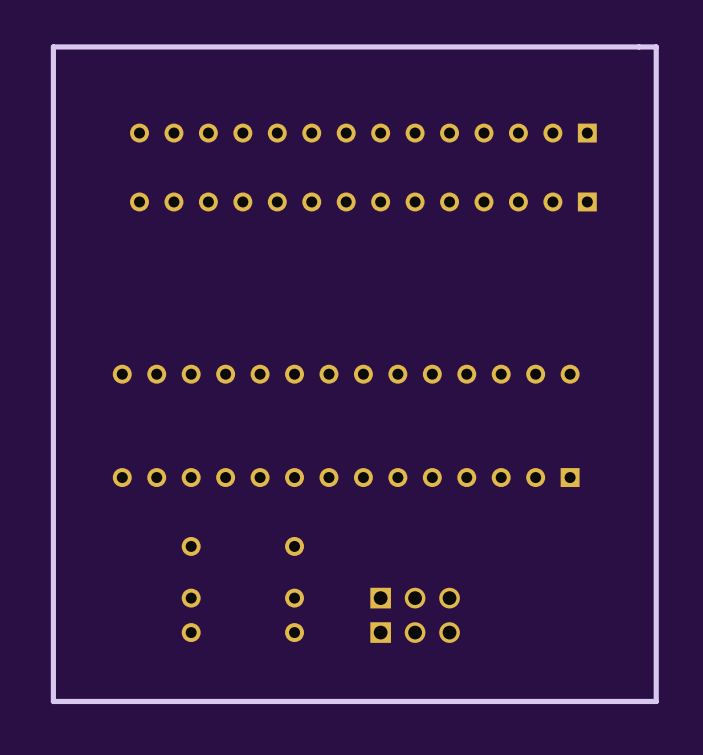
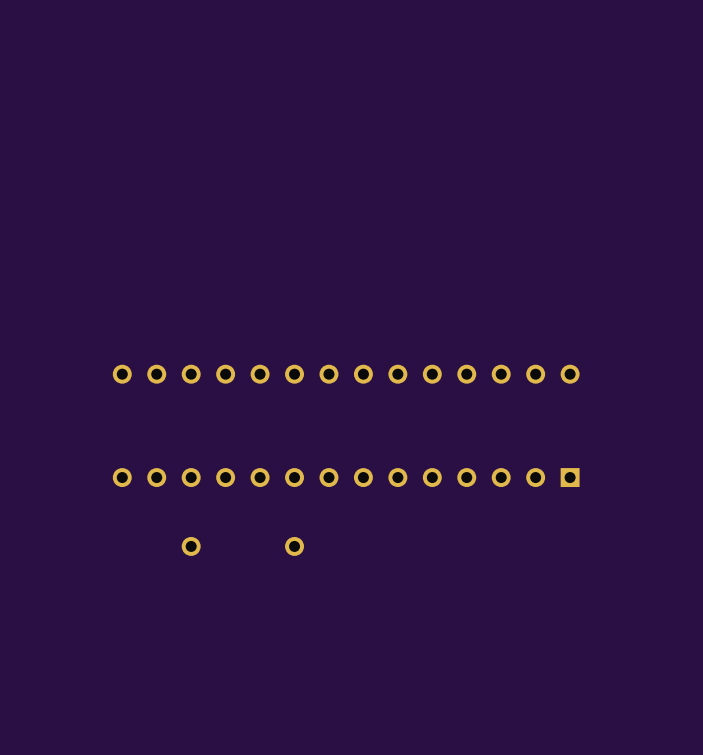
board edge: (656, 46) (53, 46) (53, 701) (656, 701) (656, 46) -> none
part: (363, 133) -> none
part: (363, 201) -> none
part: (415, 598) -> none
part: (191, 615) -> none
part: (294, 615) -> none
part: (415, 632) -> none

